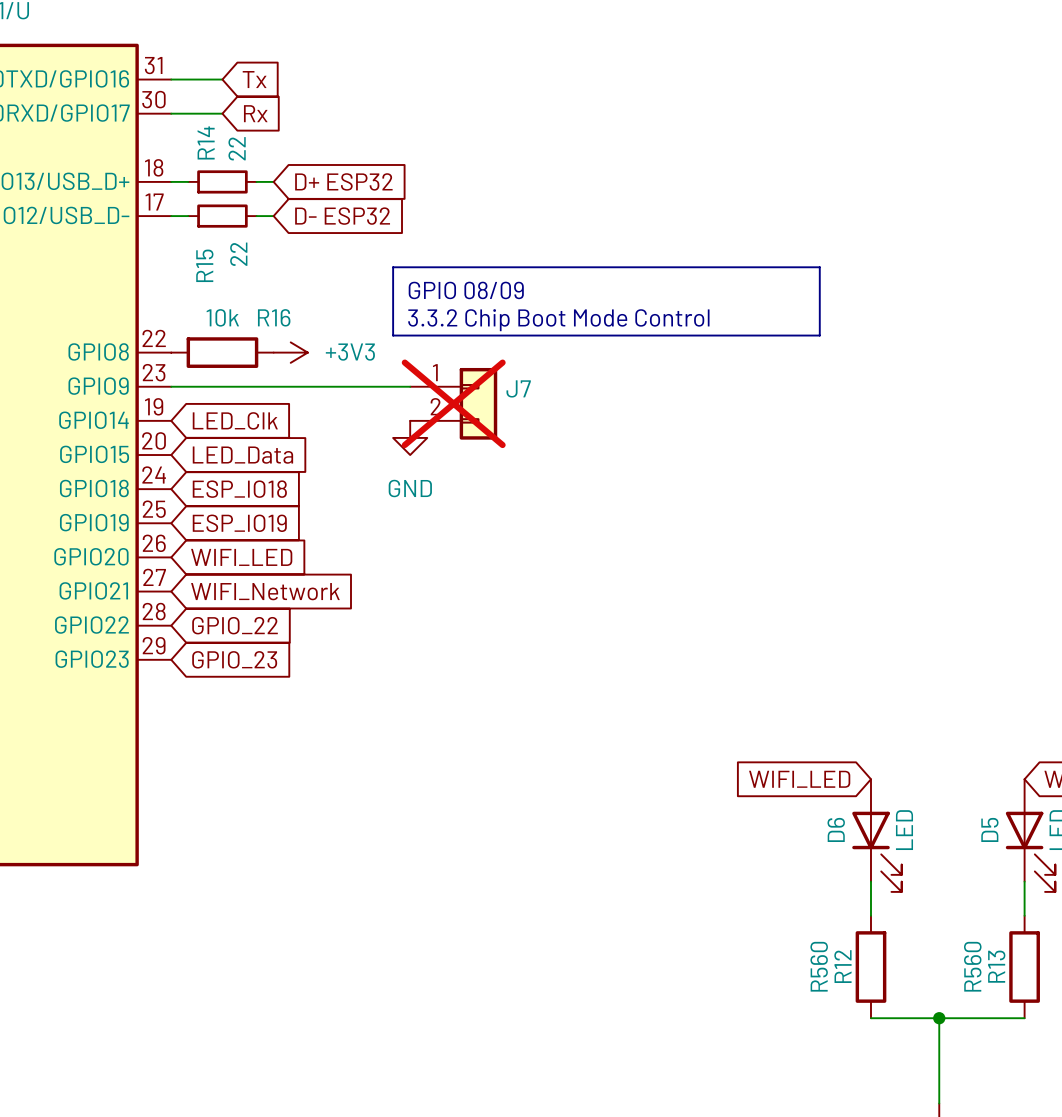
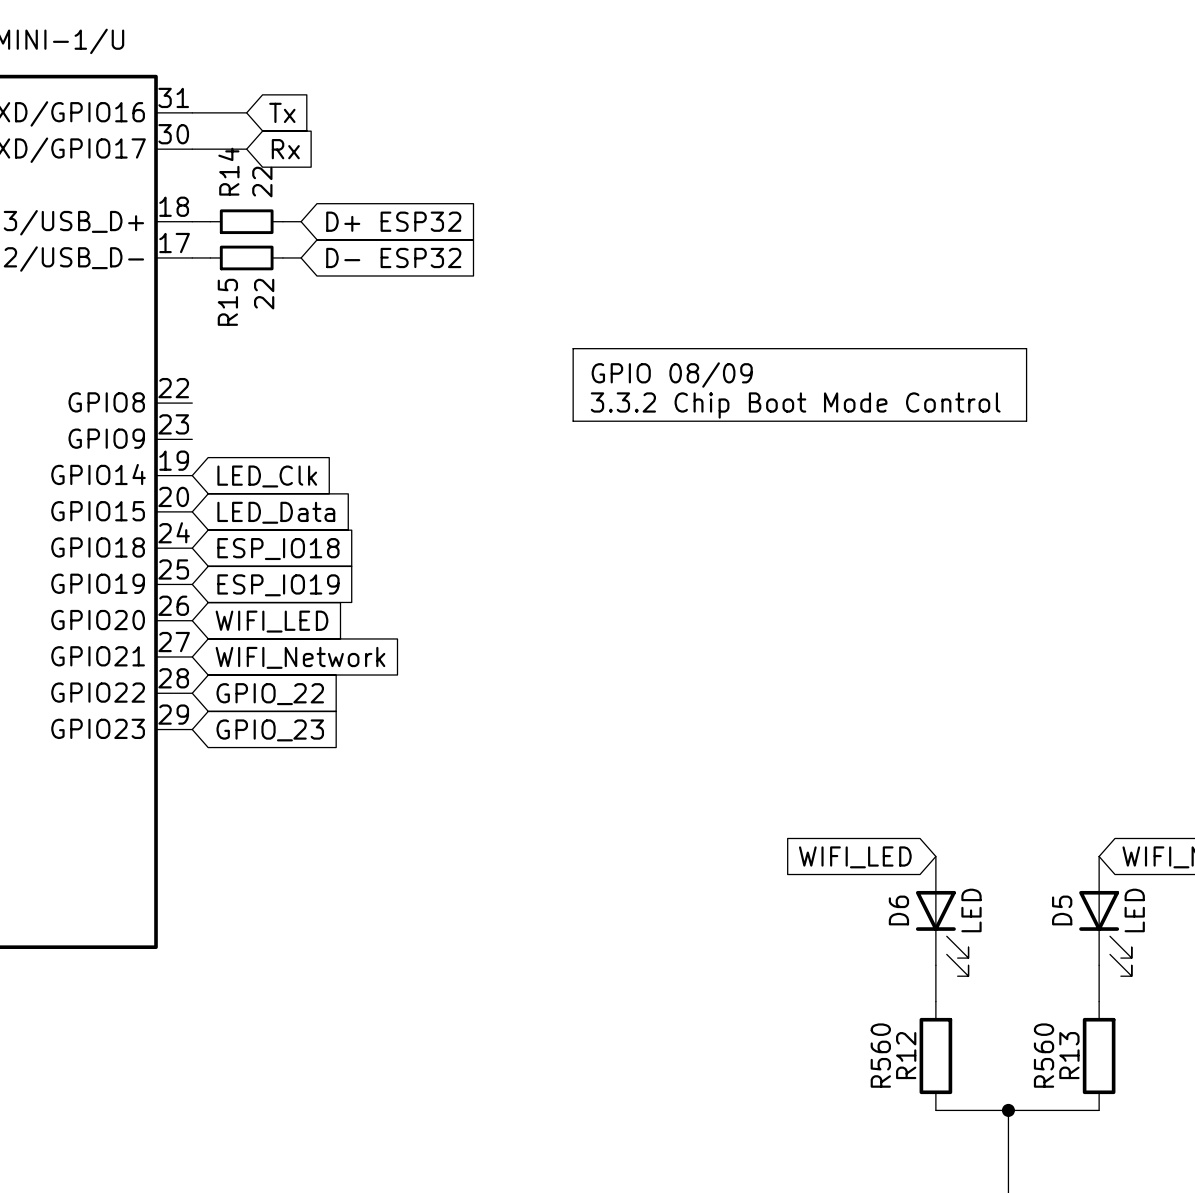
line: (393, 267) (819, 267) (819, 335) (393, 335) (393, 267) -> (573, 348) (1026, 348) (1026, 421) (573, 421) (573, 348)
text position: GPIO 08/09 (466, 290) -> GPIO 08/09 (672, 375)
text position: 3.3.2 Chip Boot Mode Control (558, 320) -> 3.3.2 Chip Boot Mode Control (795, 405)
R16: 10k (222, 352) -> none
power symbol: +3V3 (290, 352) -> none
wire: (171, 386) (410, 386) -> none
J7: (453, 403) -> none
power symbol: GND (410, 437) -> none

